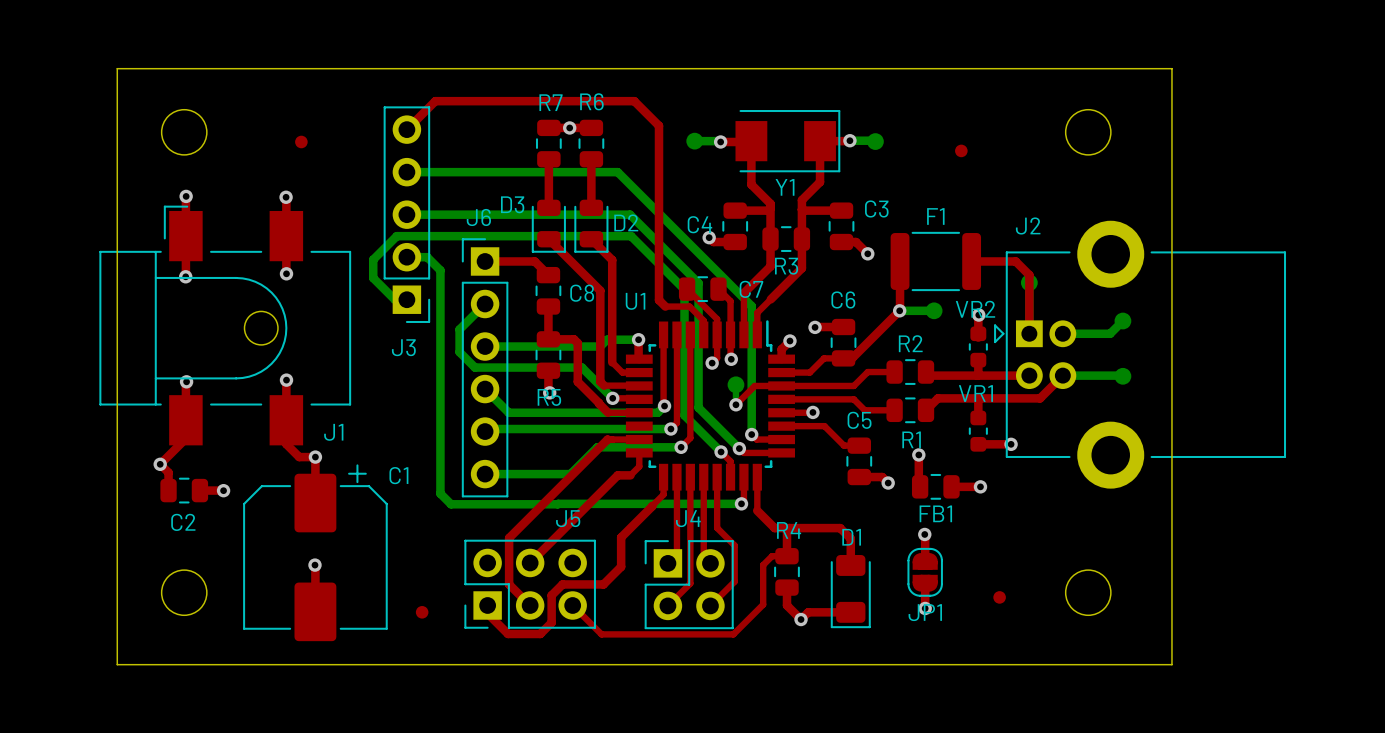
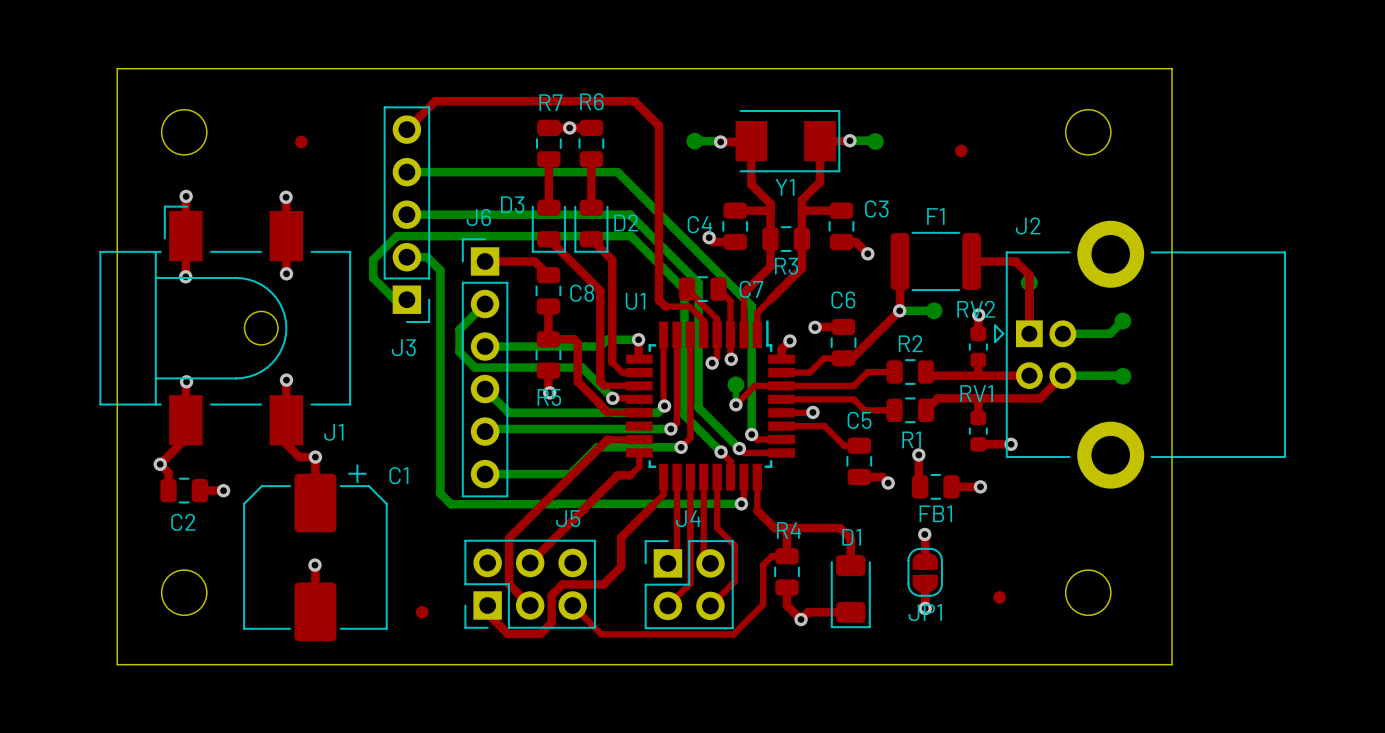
VR2 name: VR2 (975, 309) -> RV2 (976, 309)
VR1 name: VR1 (975, 393) -> RV1 (976, 393)

